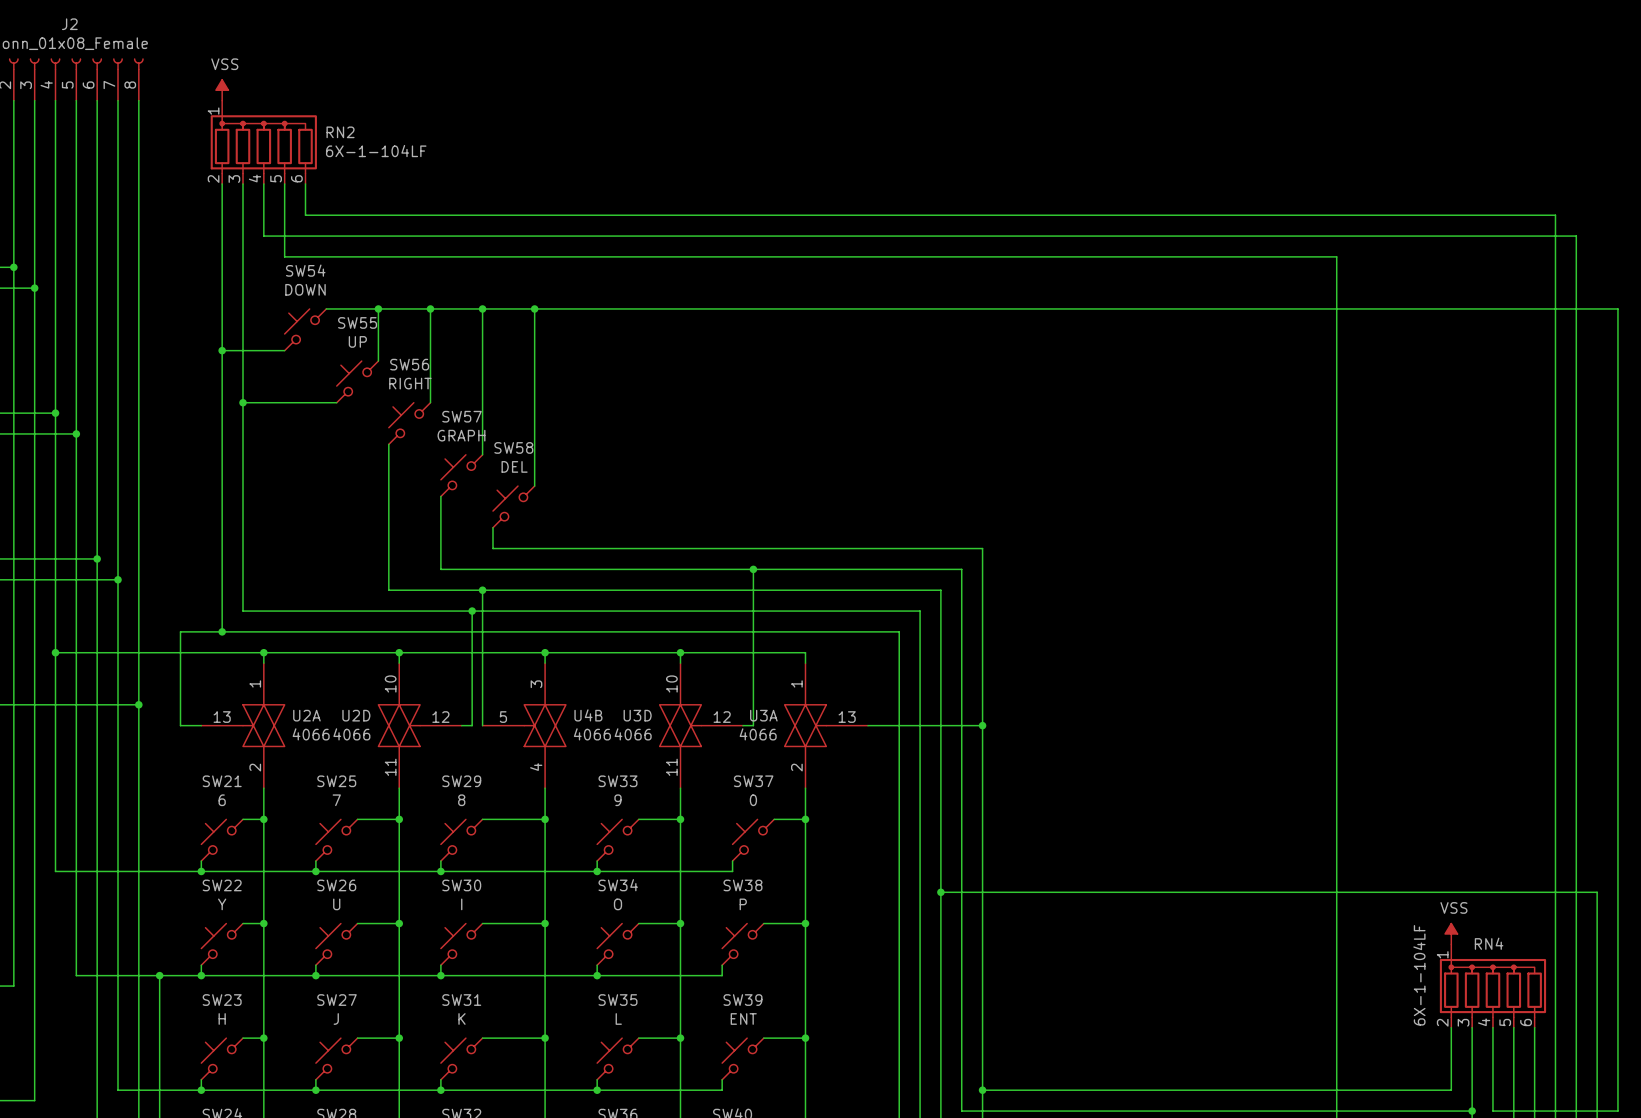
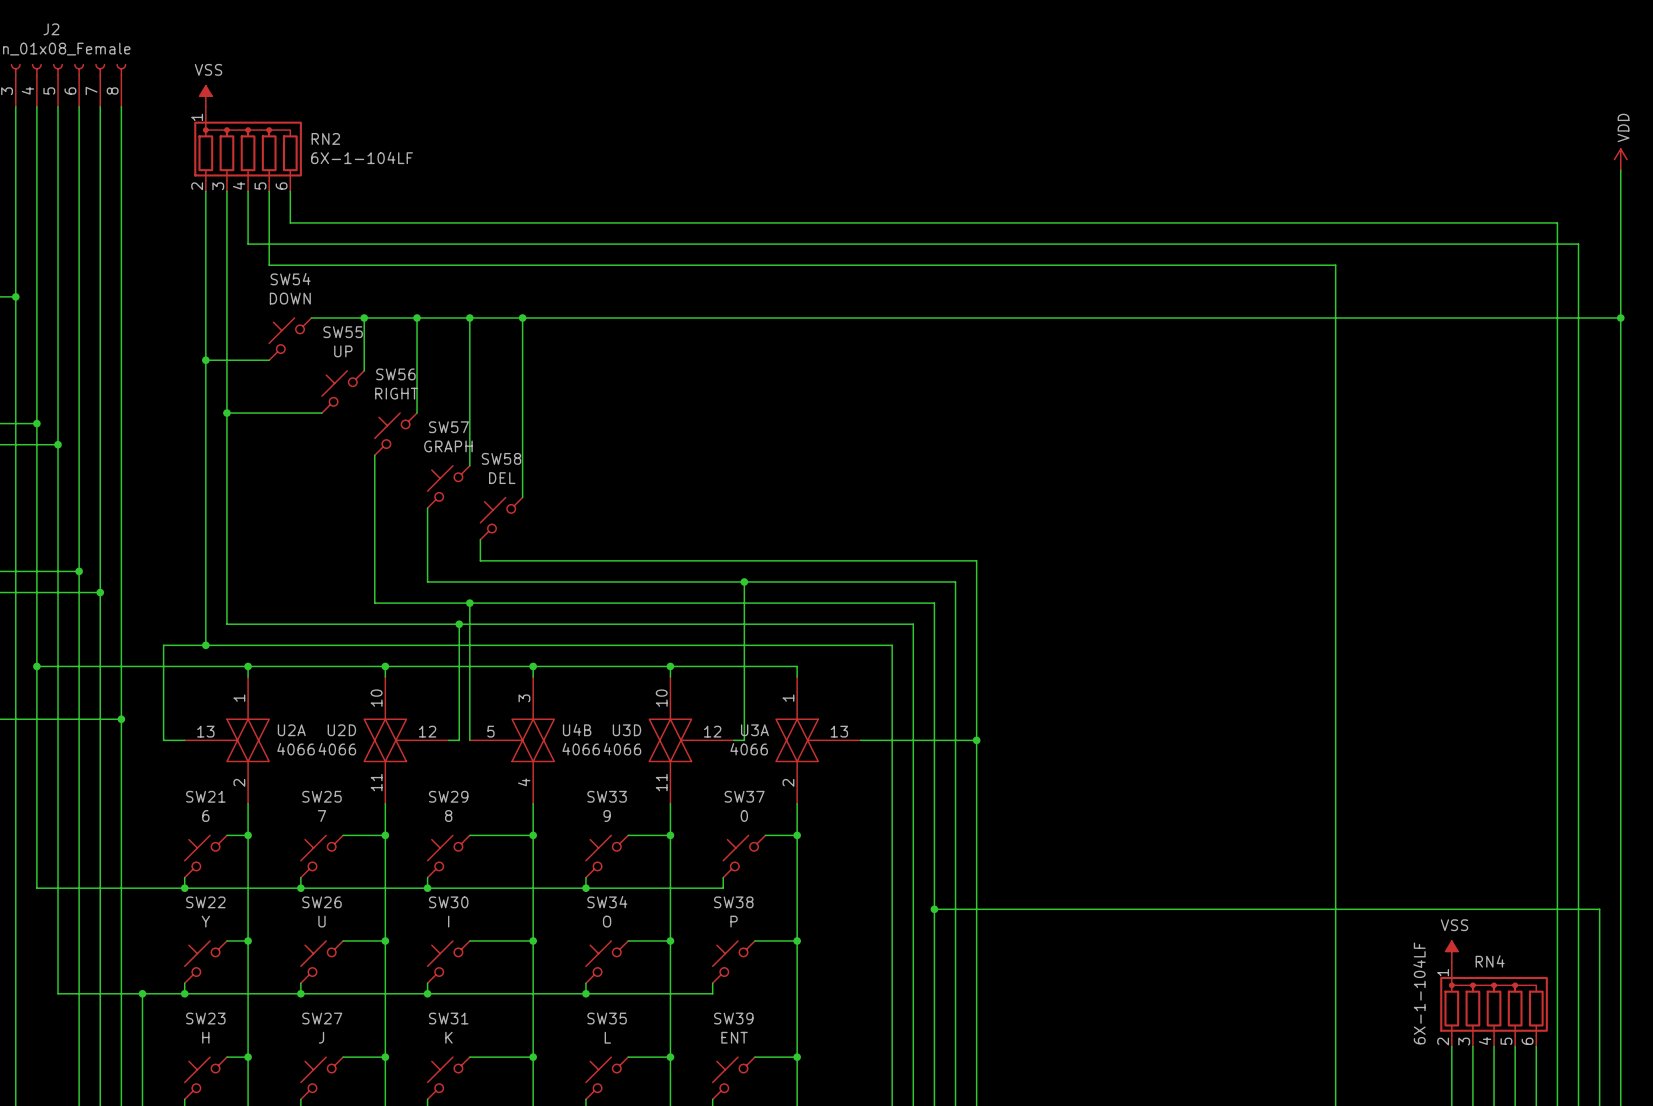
power symbol: none -> VDD (1620, 159)
wire: none -> (1620, 170) (1620, 318)
junction: none -> (1620, 318)

